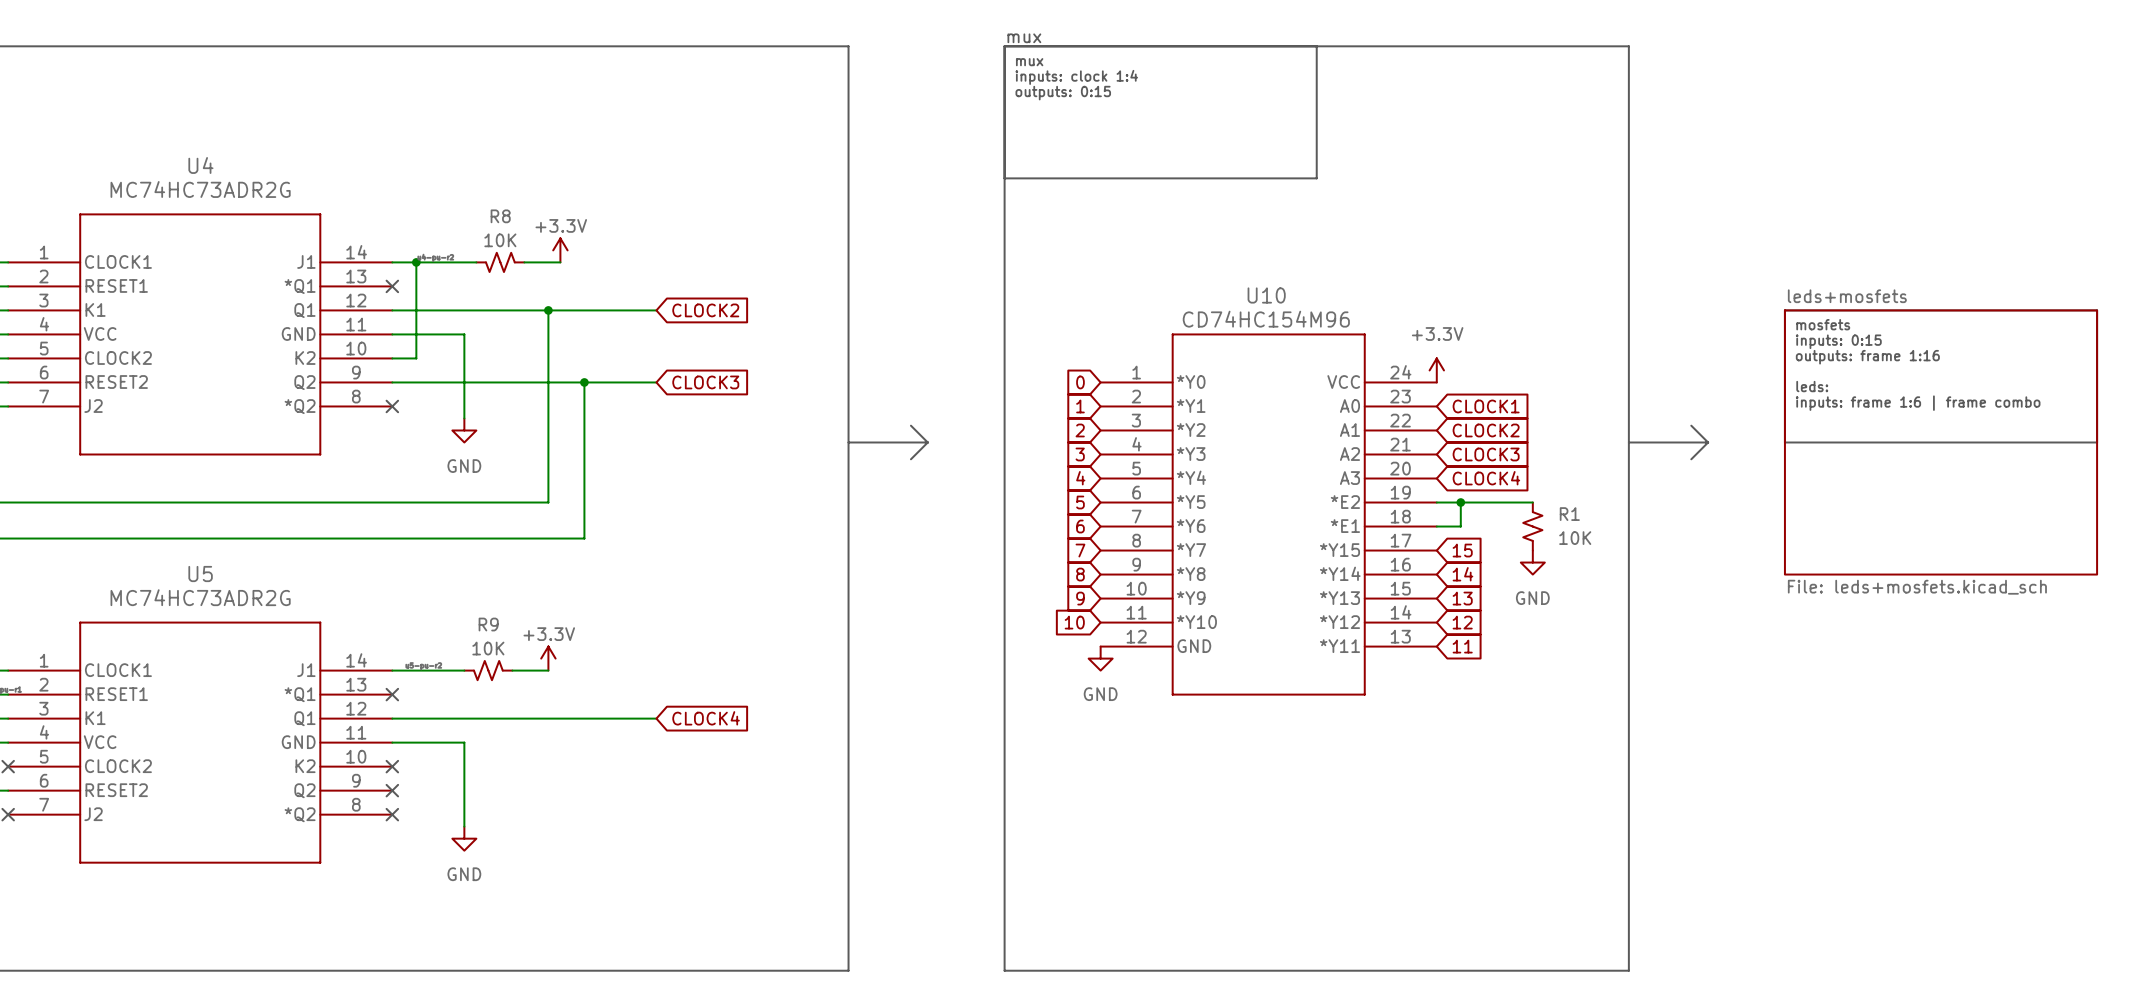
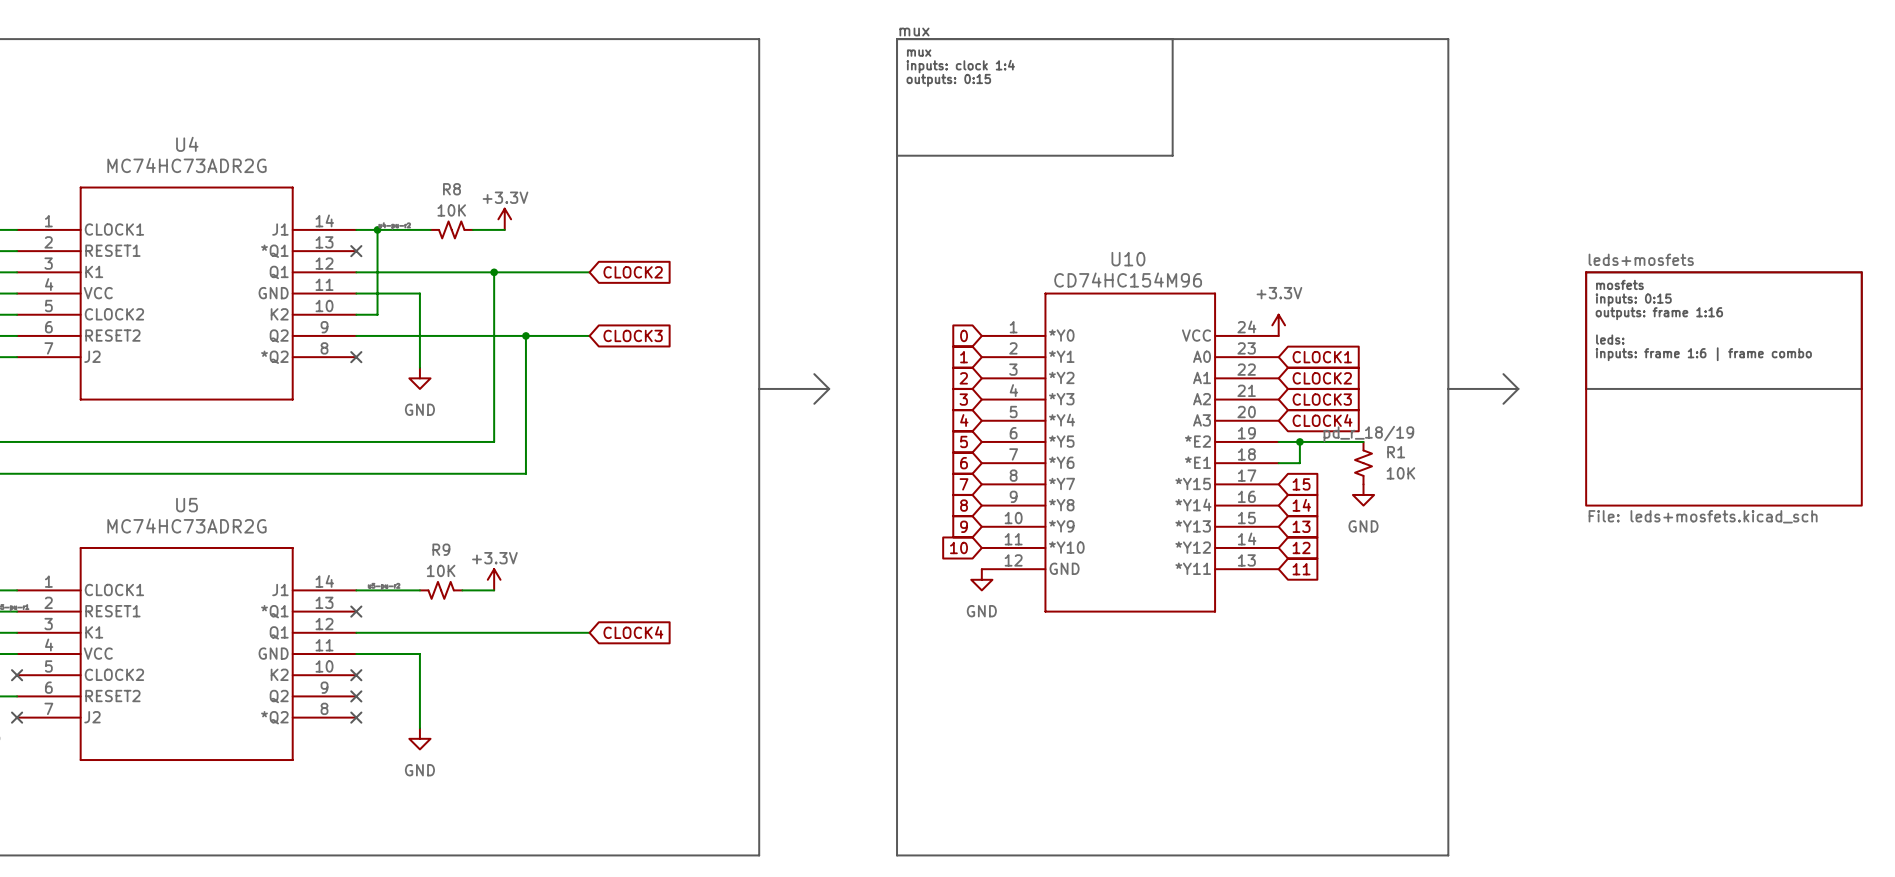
label: none -> pd_r_18/19 (1368, 434)

